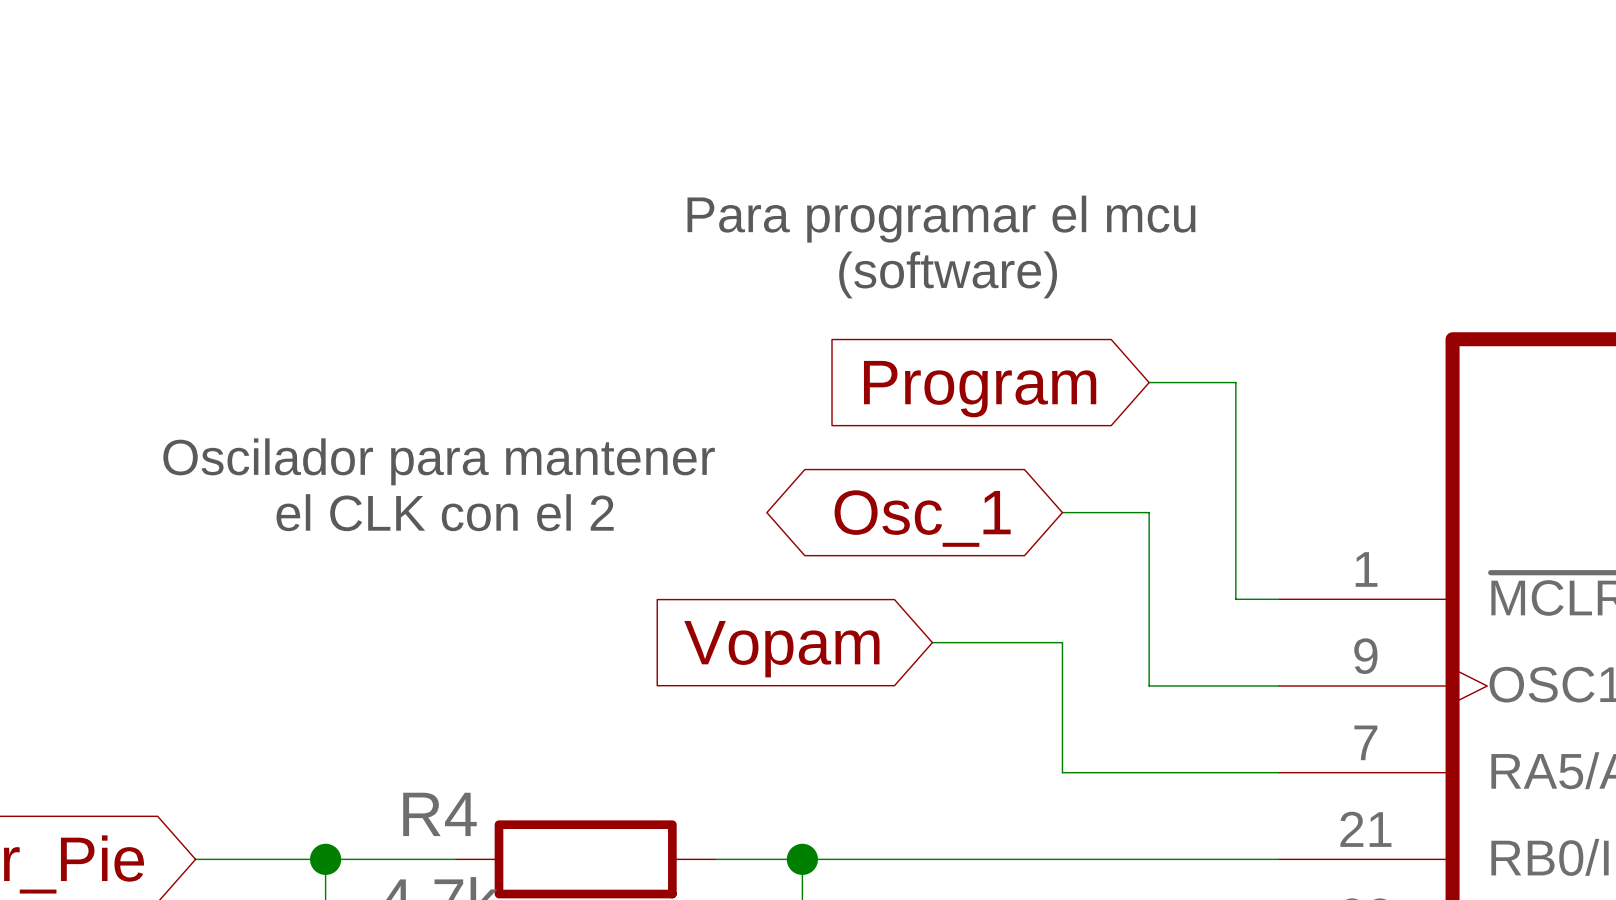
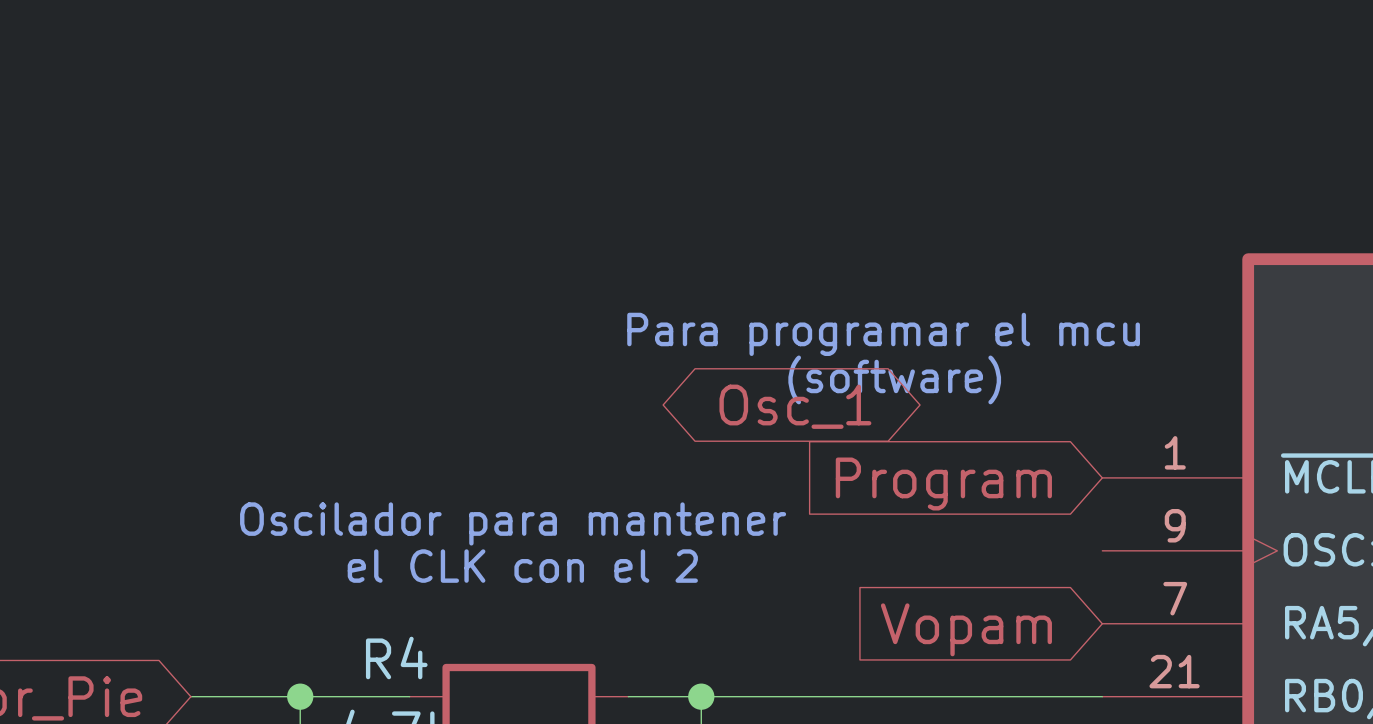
text position: Para programar el mcu (941, 219) -> Para programar el mcu (883, 334)
text position: (software) (948, 274) -> (software) (894, 379)
wire: (1149, 382) (1235, 382) (1235, 599) (1279, 599) -> none
global label position: Program (980, 389) -> Program (943, 484)
text position: Oscilador para mantener (439, 461) -> Oscilador para mantener (513, 523)
text position: el CLK con el 2 (445, 512) -> el CLK con el 2 (522, 566)
wire: (1062, 512) (1149, 512) (1149, 685) (1279, 685) -> none
wire: (932, 642) (1062, 642) (1062, 772) (1279, 772) -> none
global label position: Vopam (781, 649) -> Vopam (966, 629)

